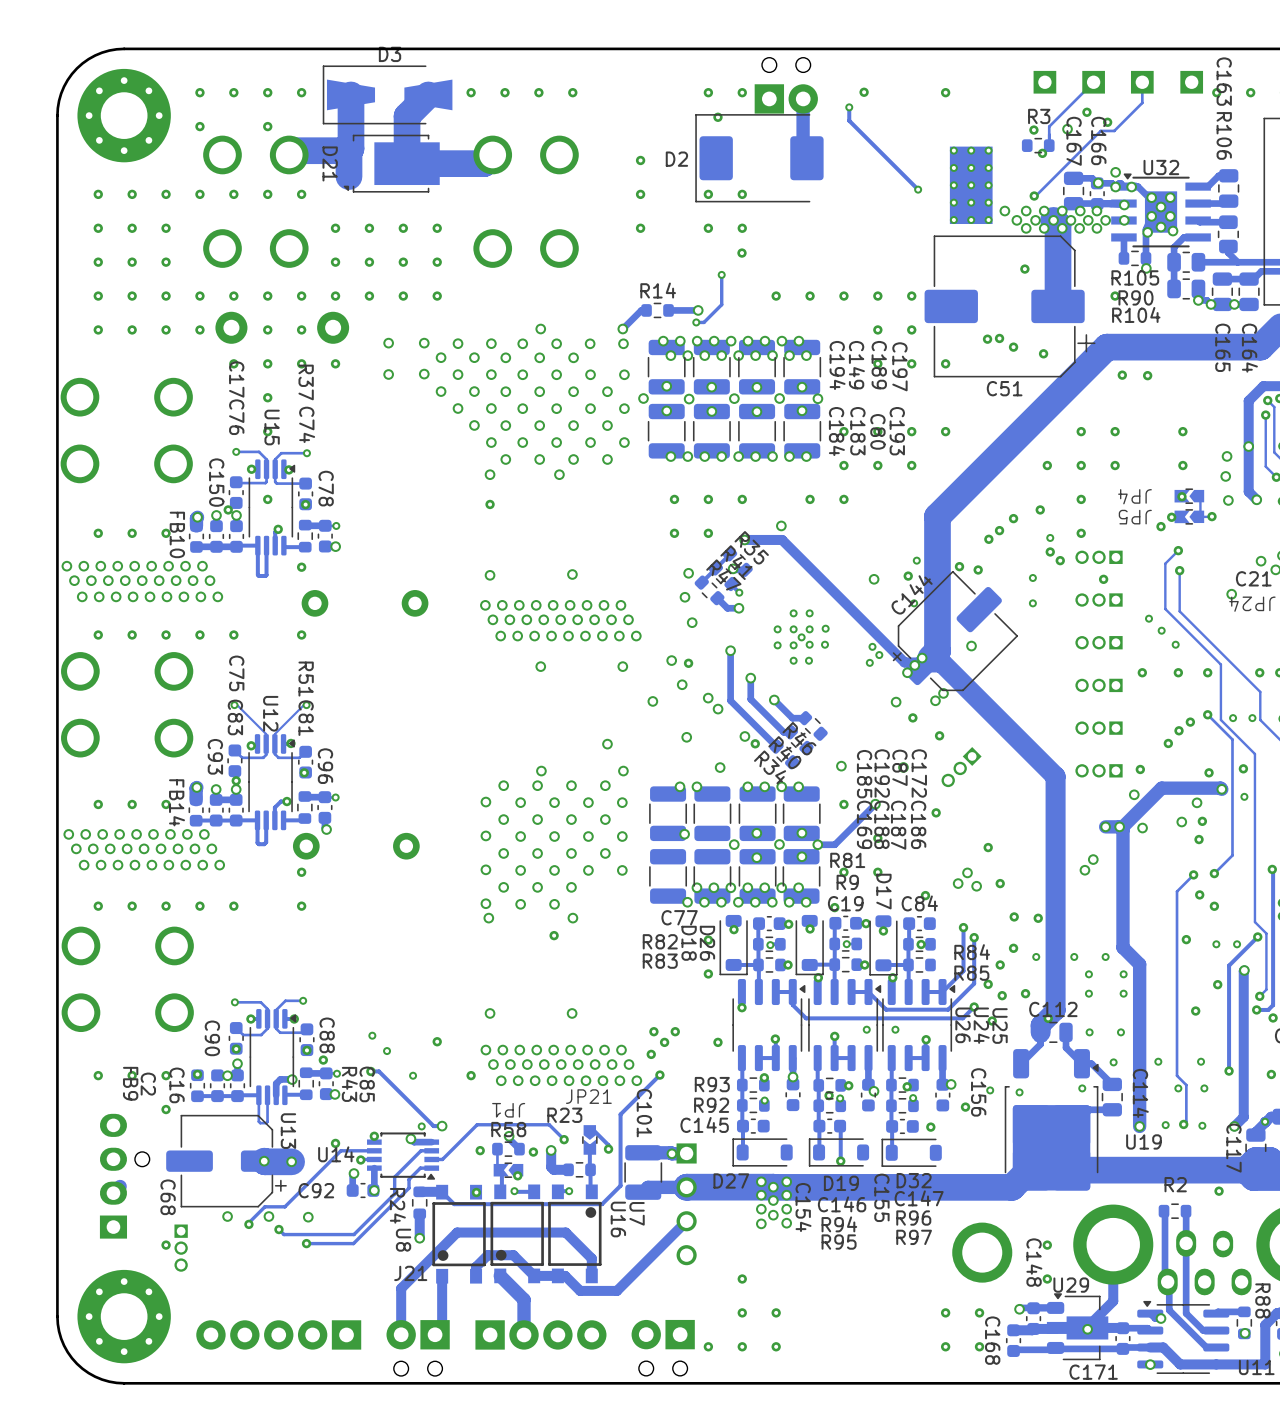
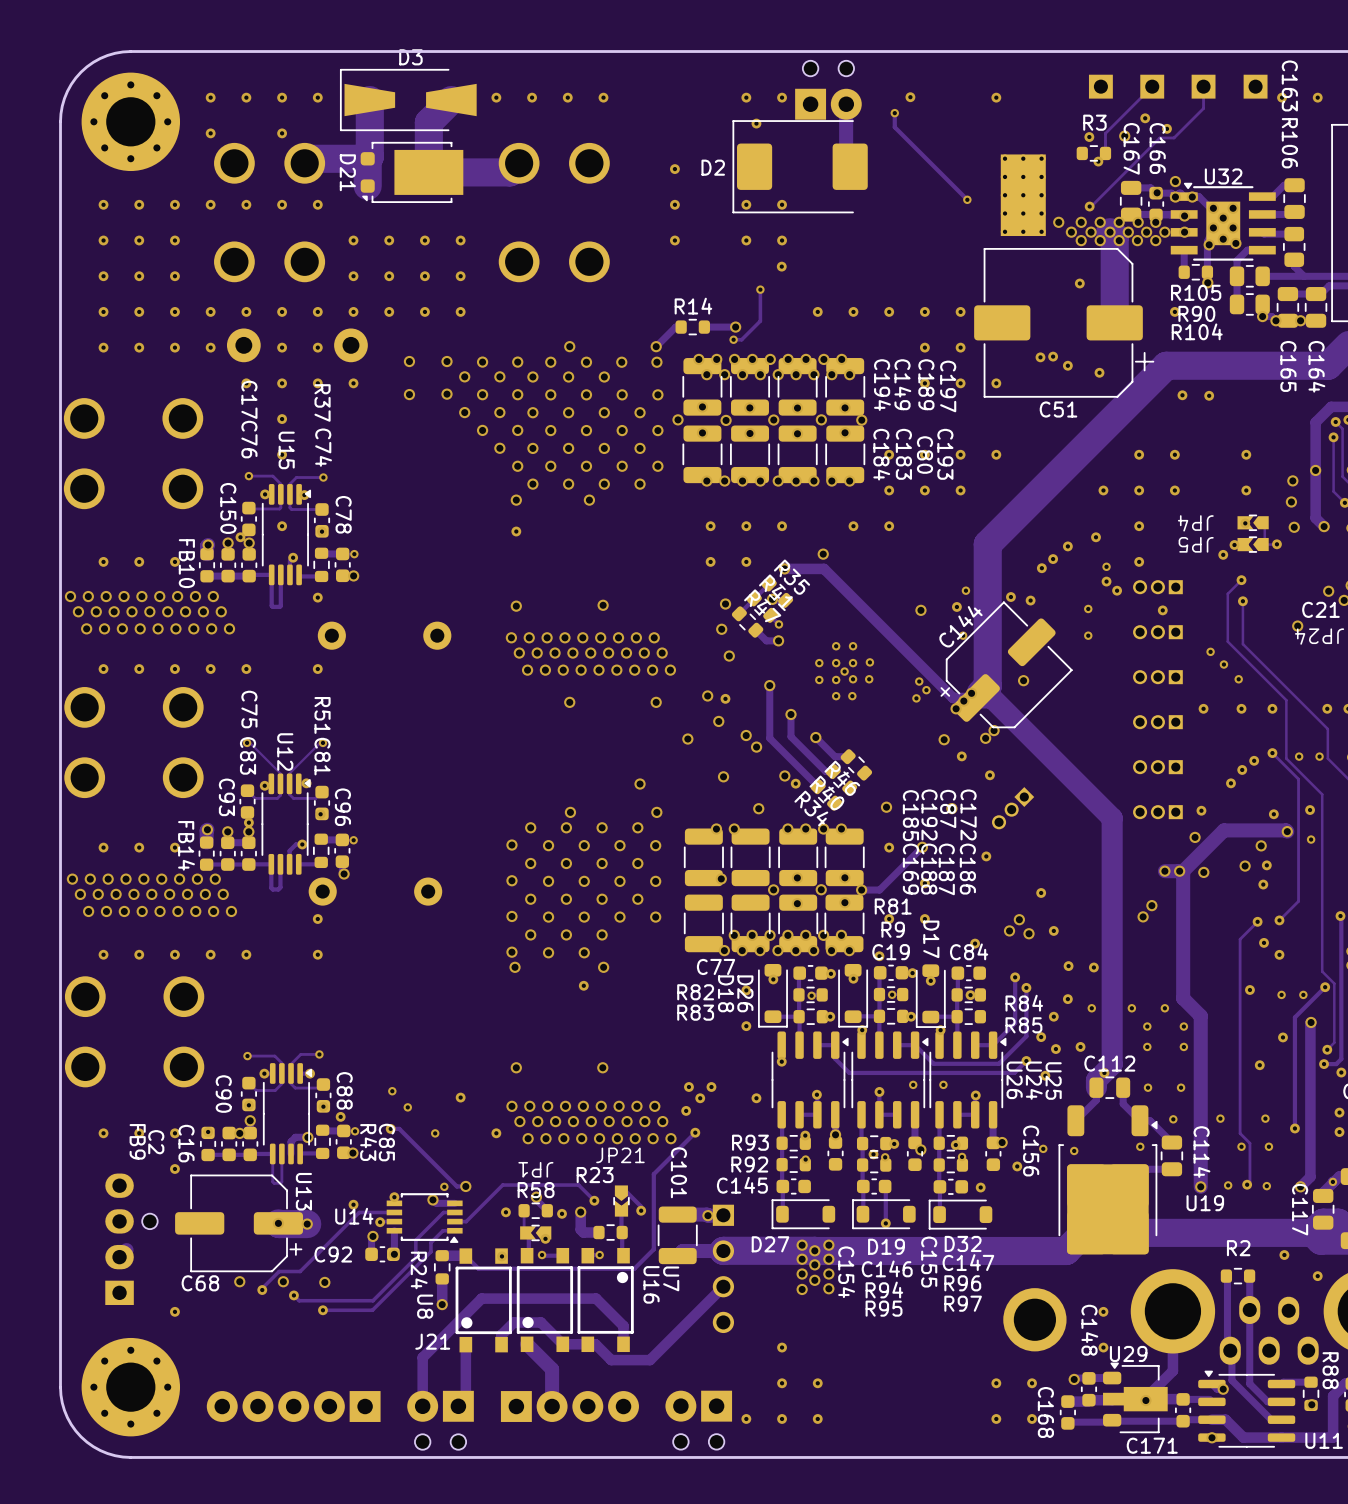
via: none -> (1339, 1112)
C68 name rotation: 0° (168, 1197) -> 90° counterclockwise (200, 1283)
via: none -> (1317, 1276)
part: (181, 1248) -> none

